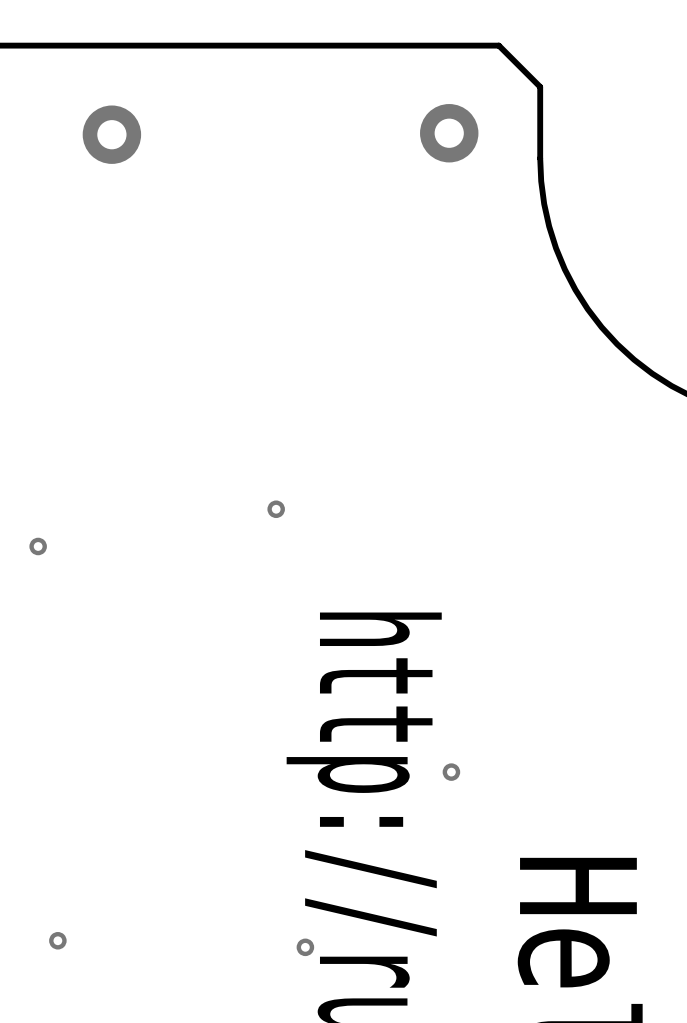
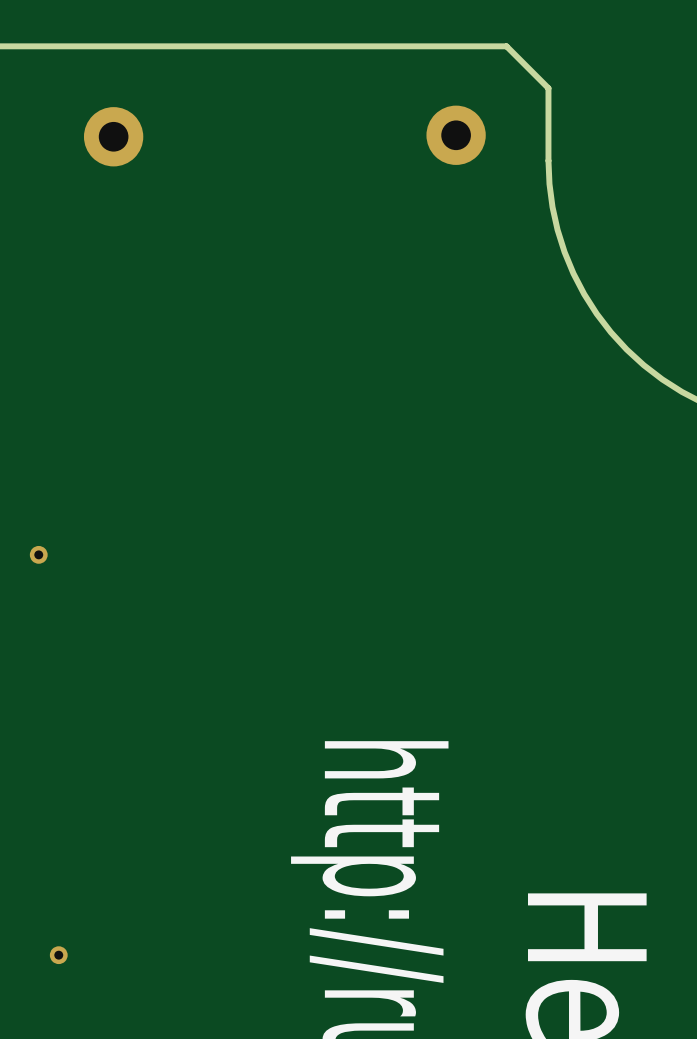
via: (276, 509) -> none
via: (451, 772) -> none
via: (305, 947) -> none

